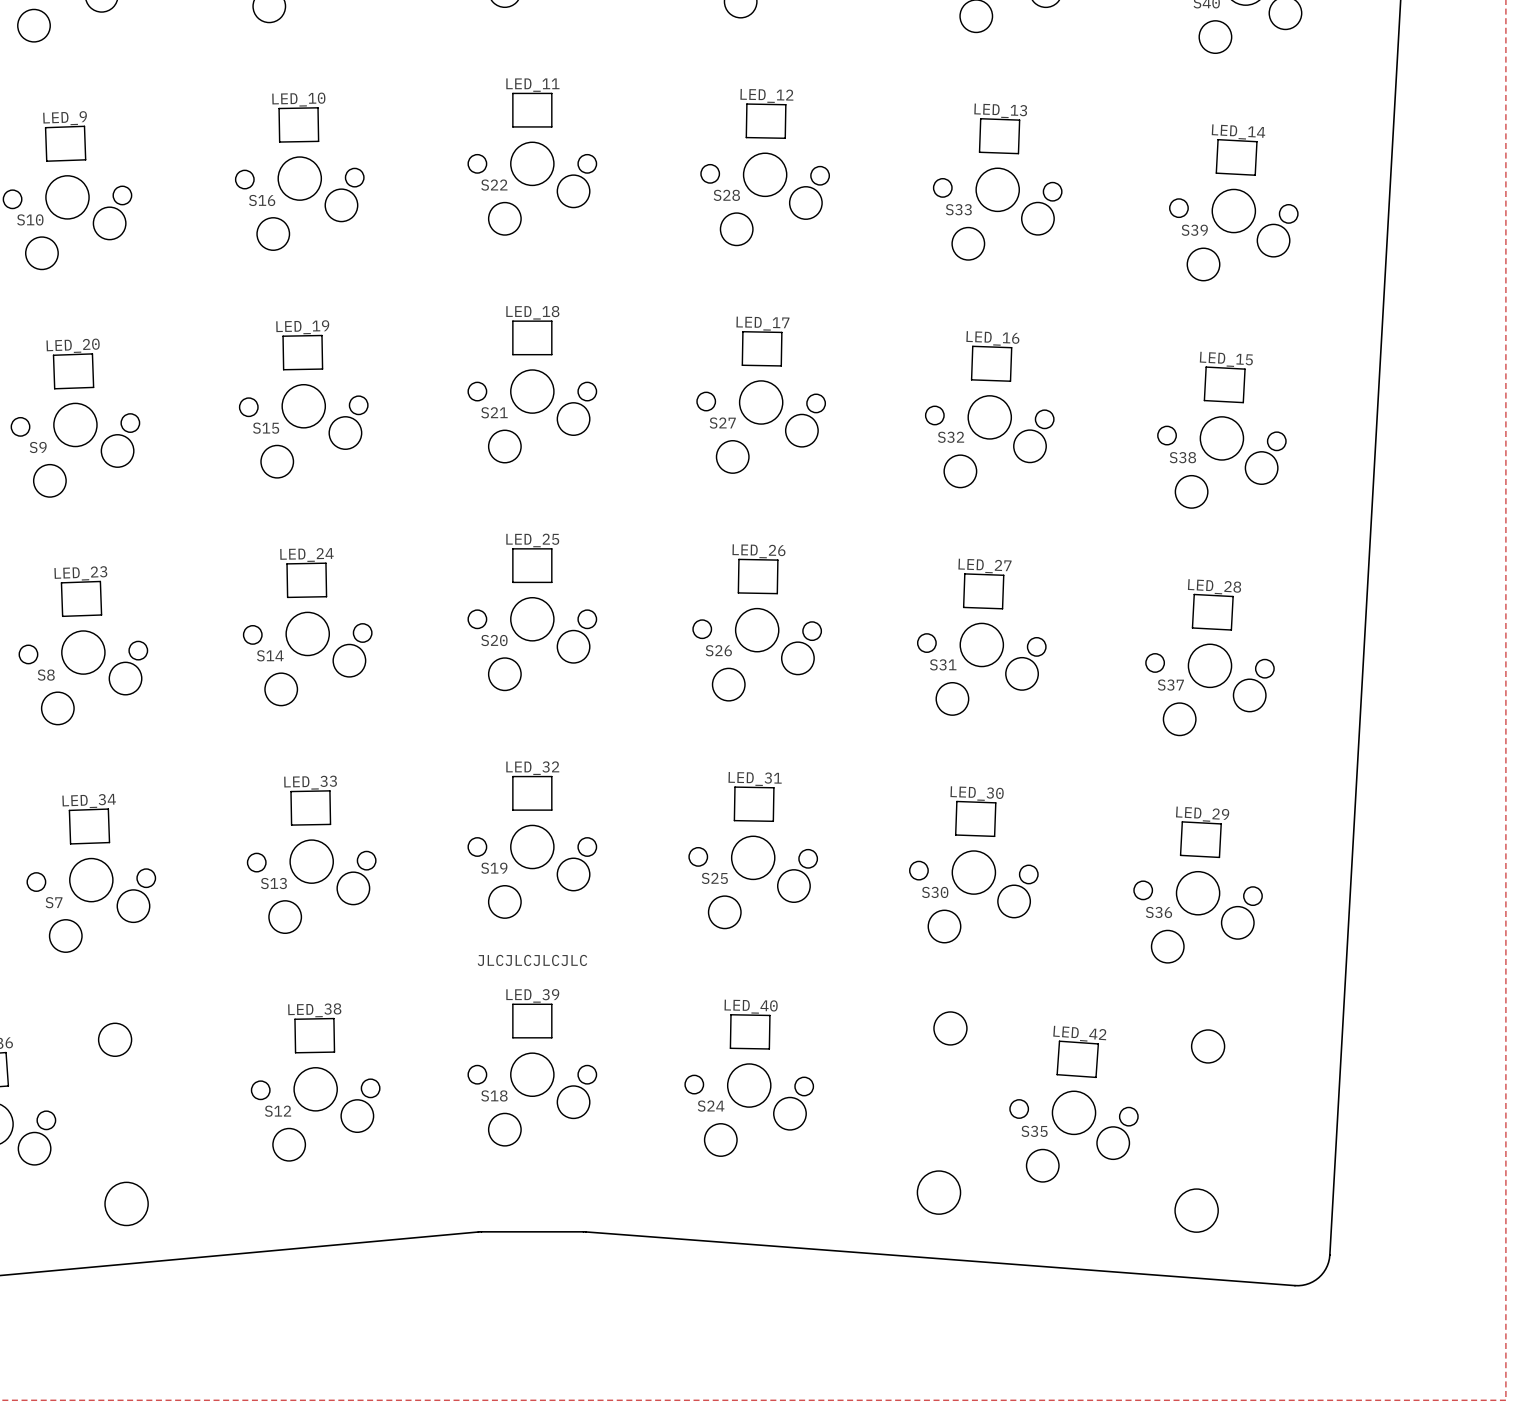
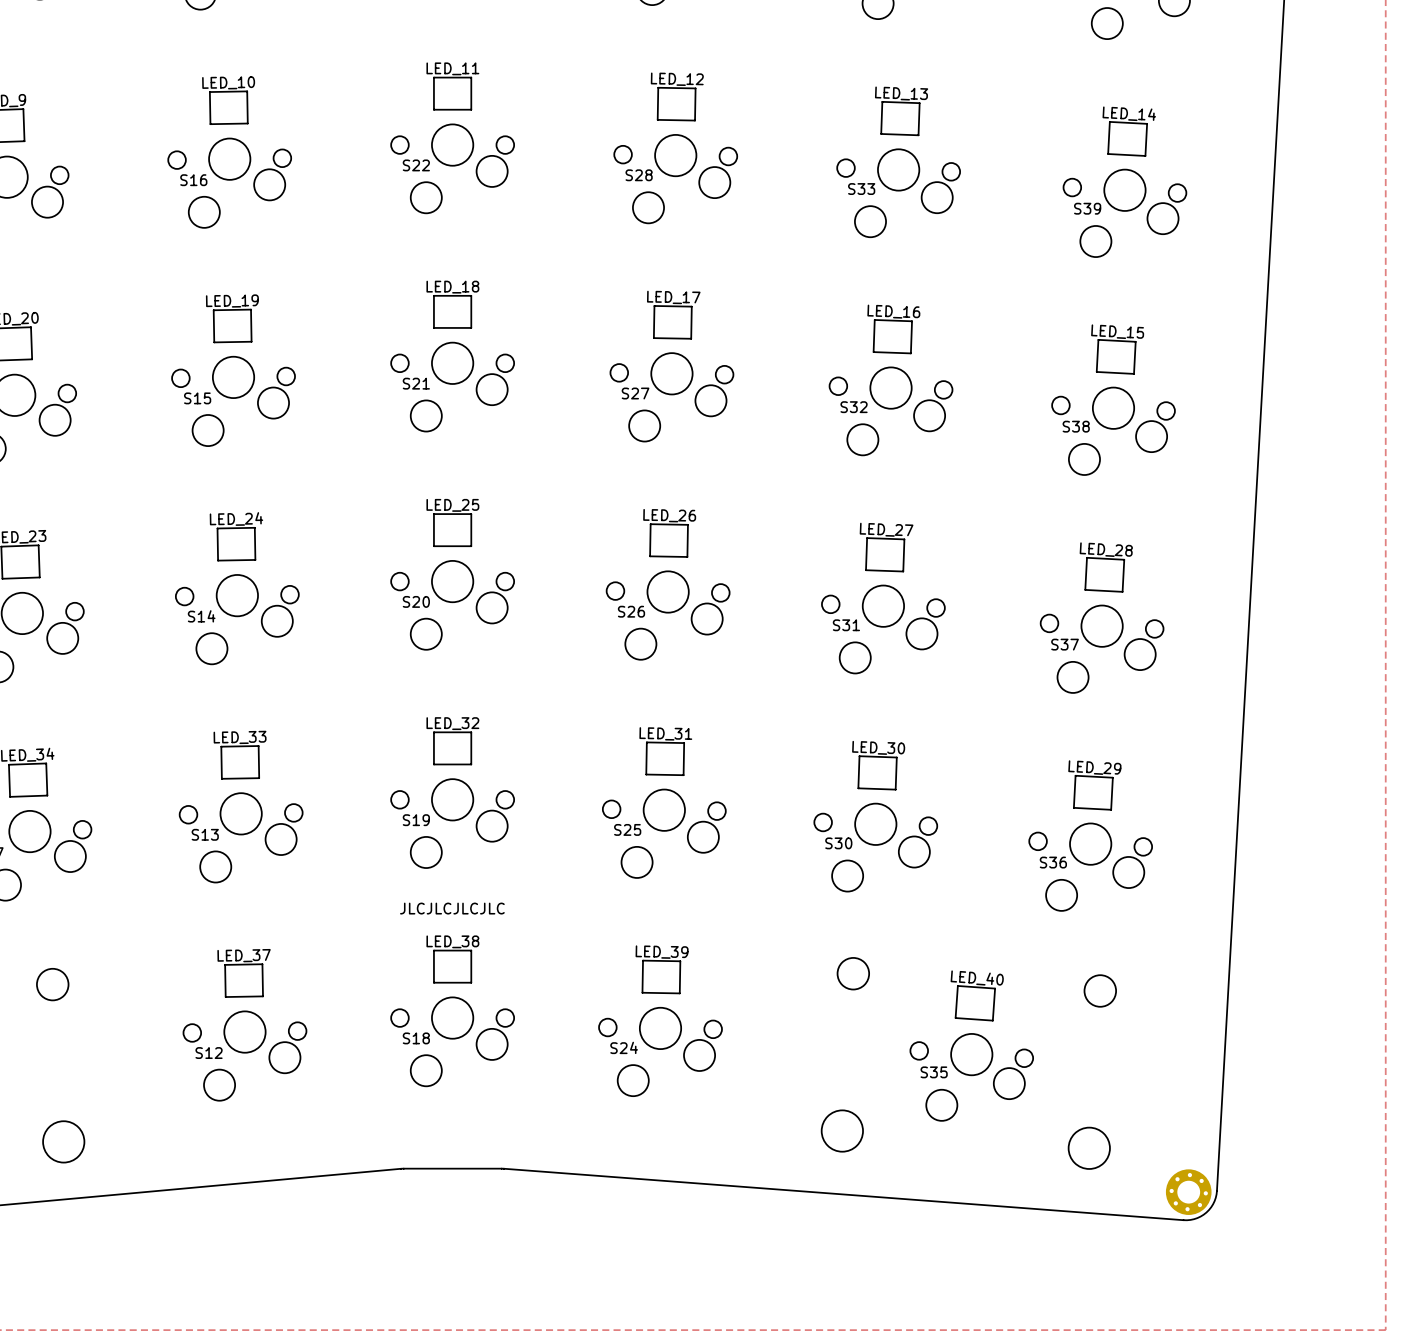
text: LED_39 (532, 995) -> LED_38 (452, 941)
text: LED_40 (751, 1006) -> LED_39 (662, 952)
text: LED_38 (314, 1010) -> LED_37 (244, 955)
text: LED_42 (1079, 1033) -> LED_40 (977, 978)
part: none -> (1188, 1192)

